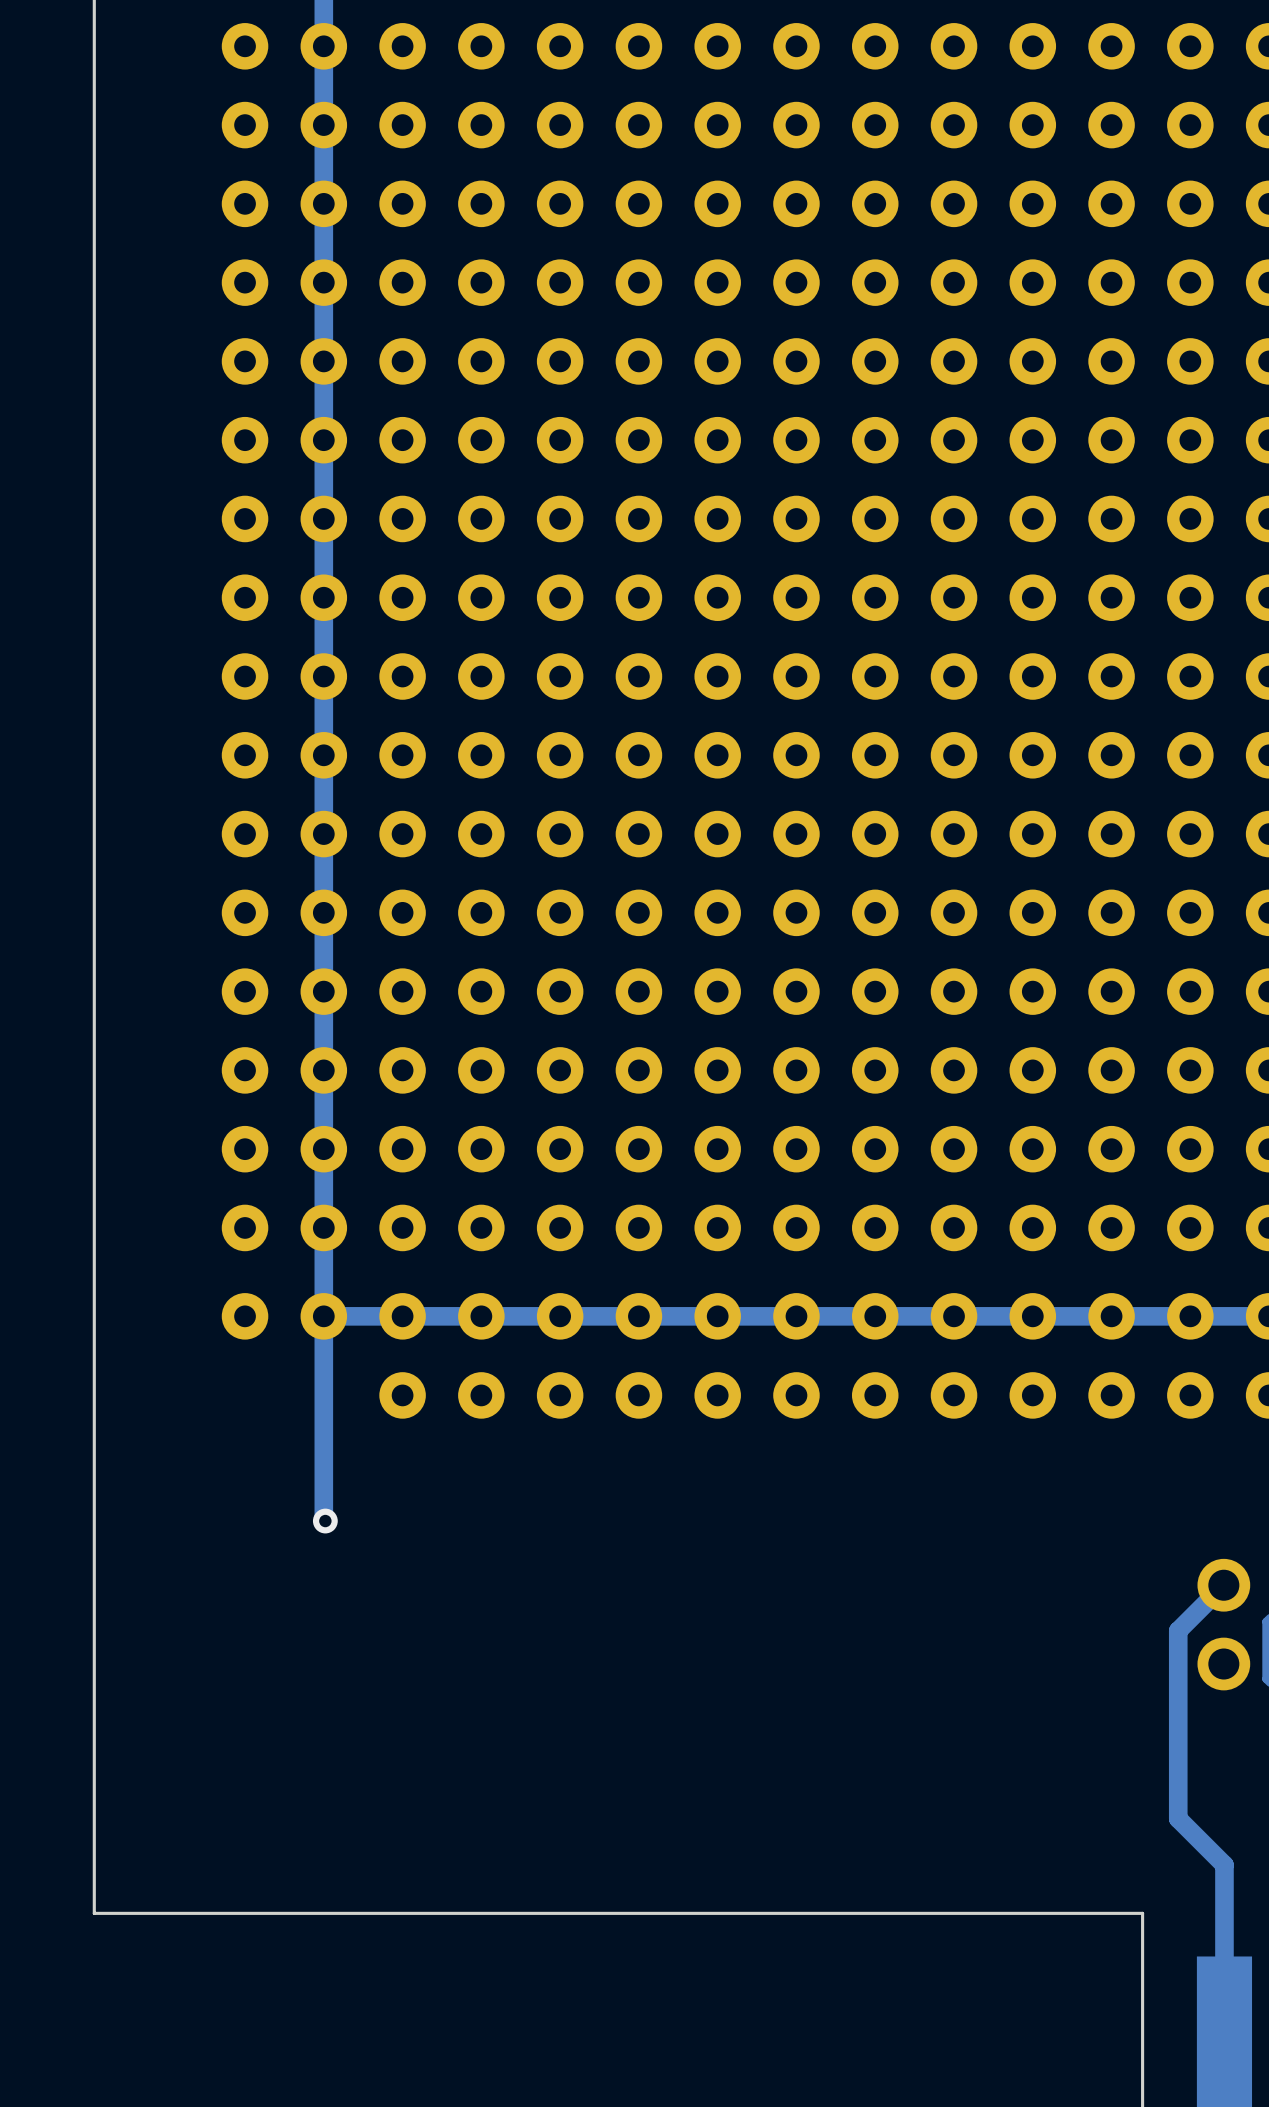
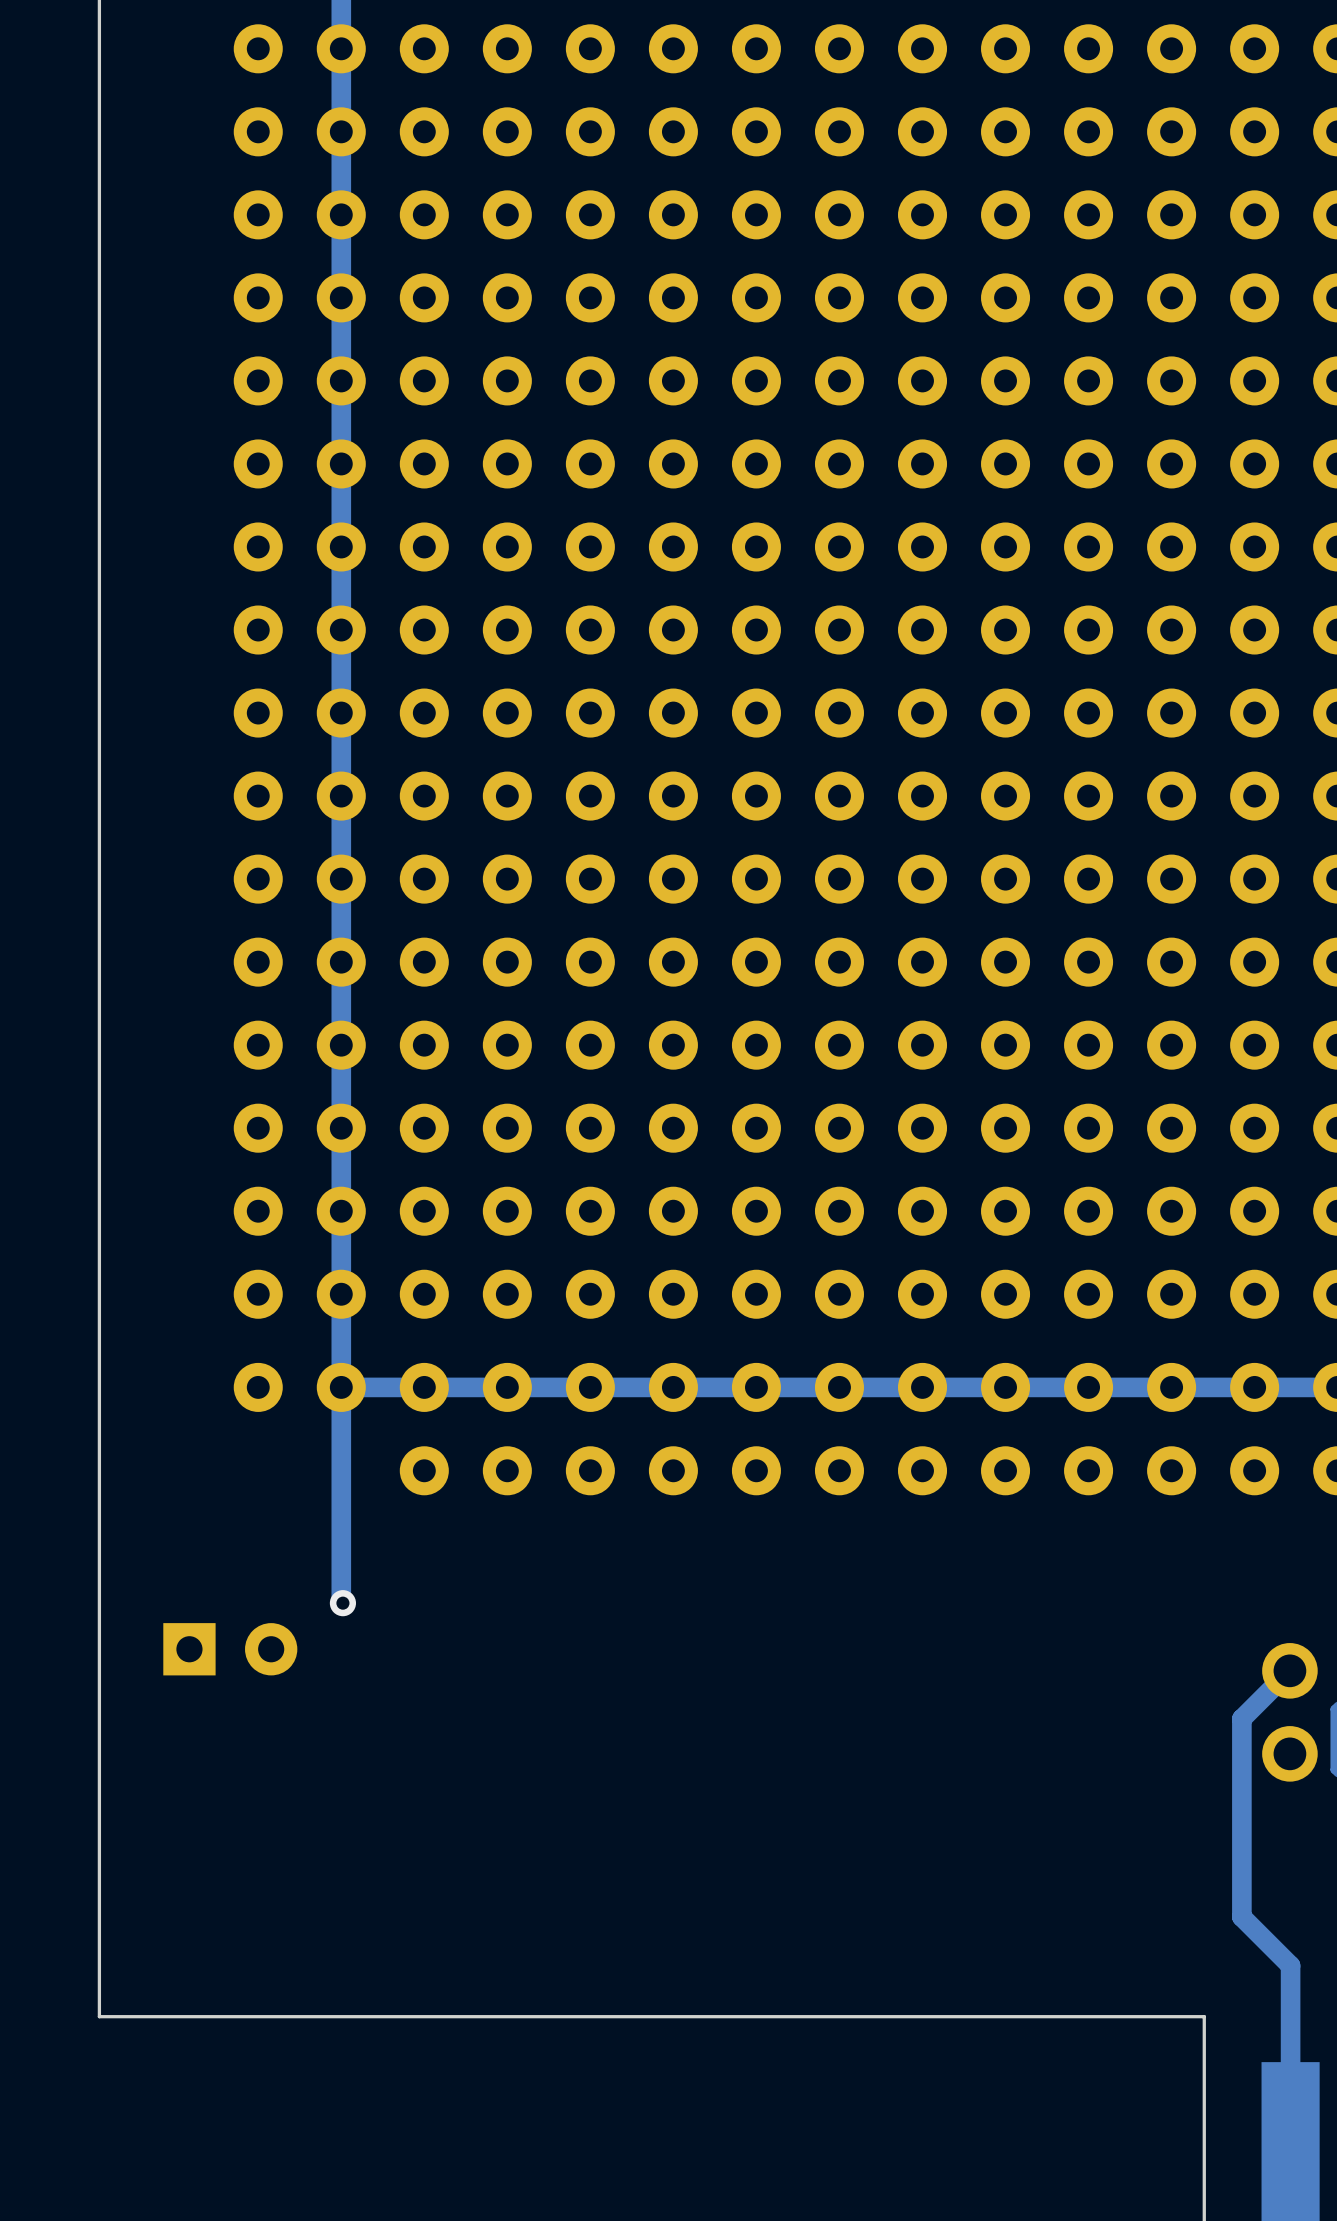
part: none -> (230, 1649)

